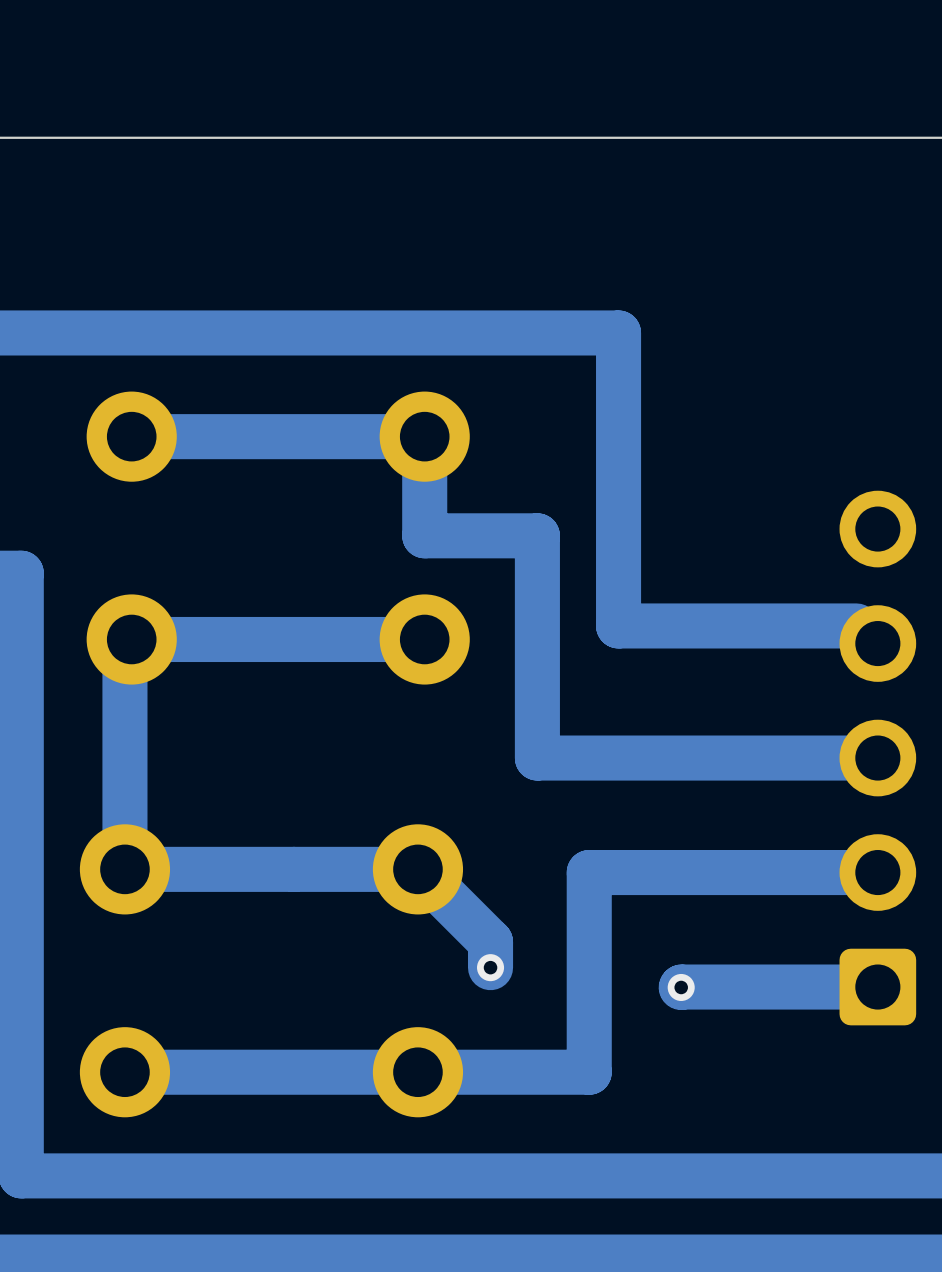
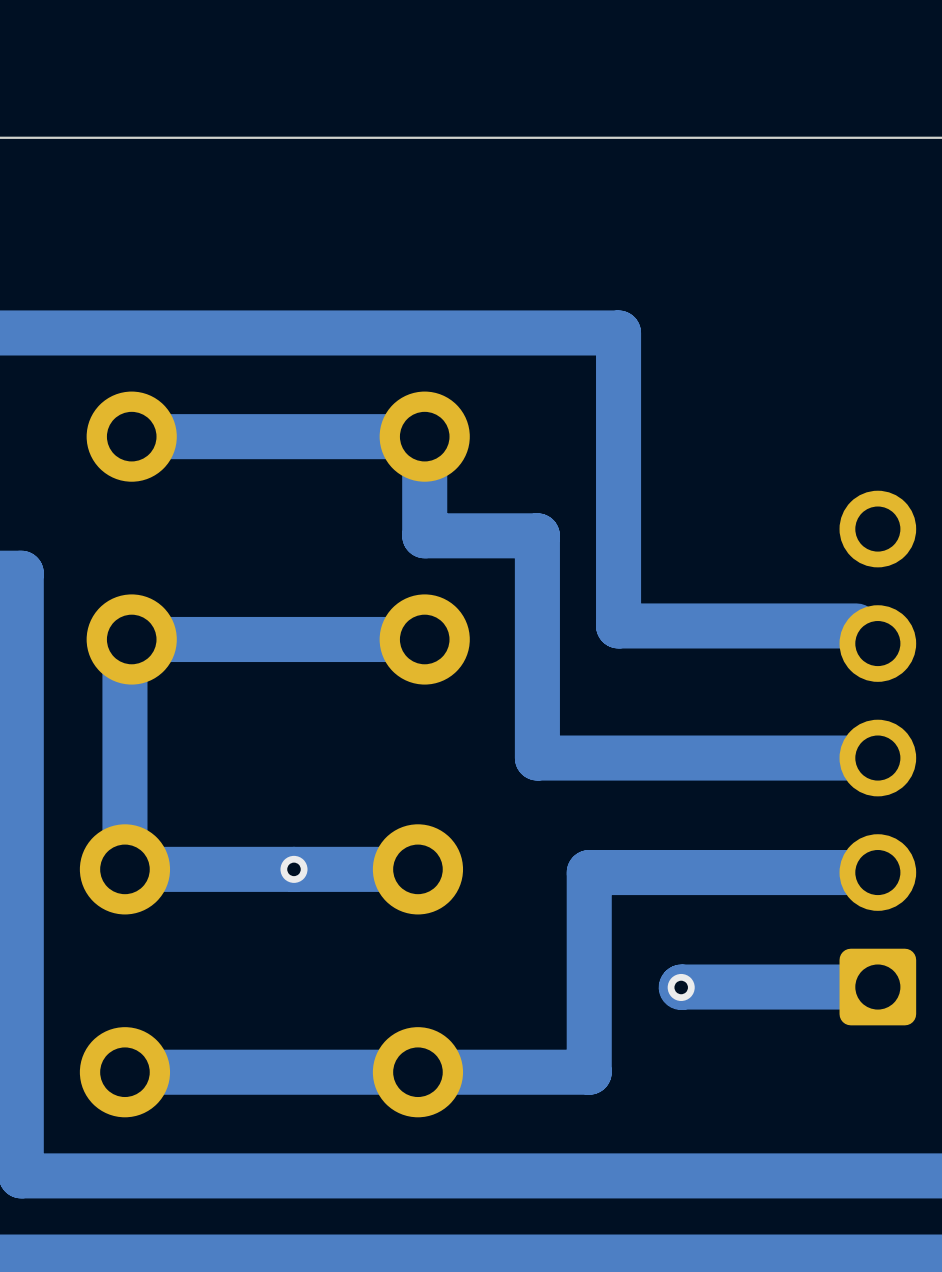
track: (417, 869) (490, 941) (490, 967) -> none
via position: (490, 967) -> (293, 869)

